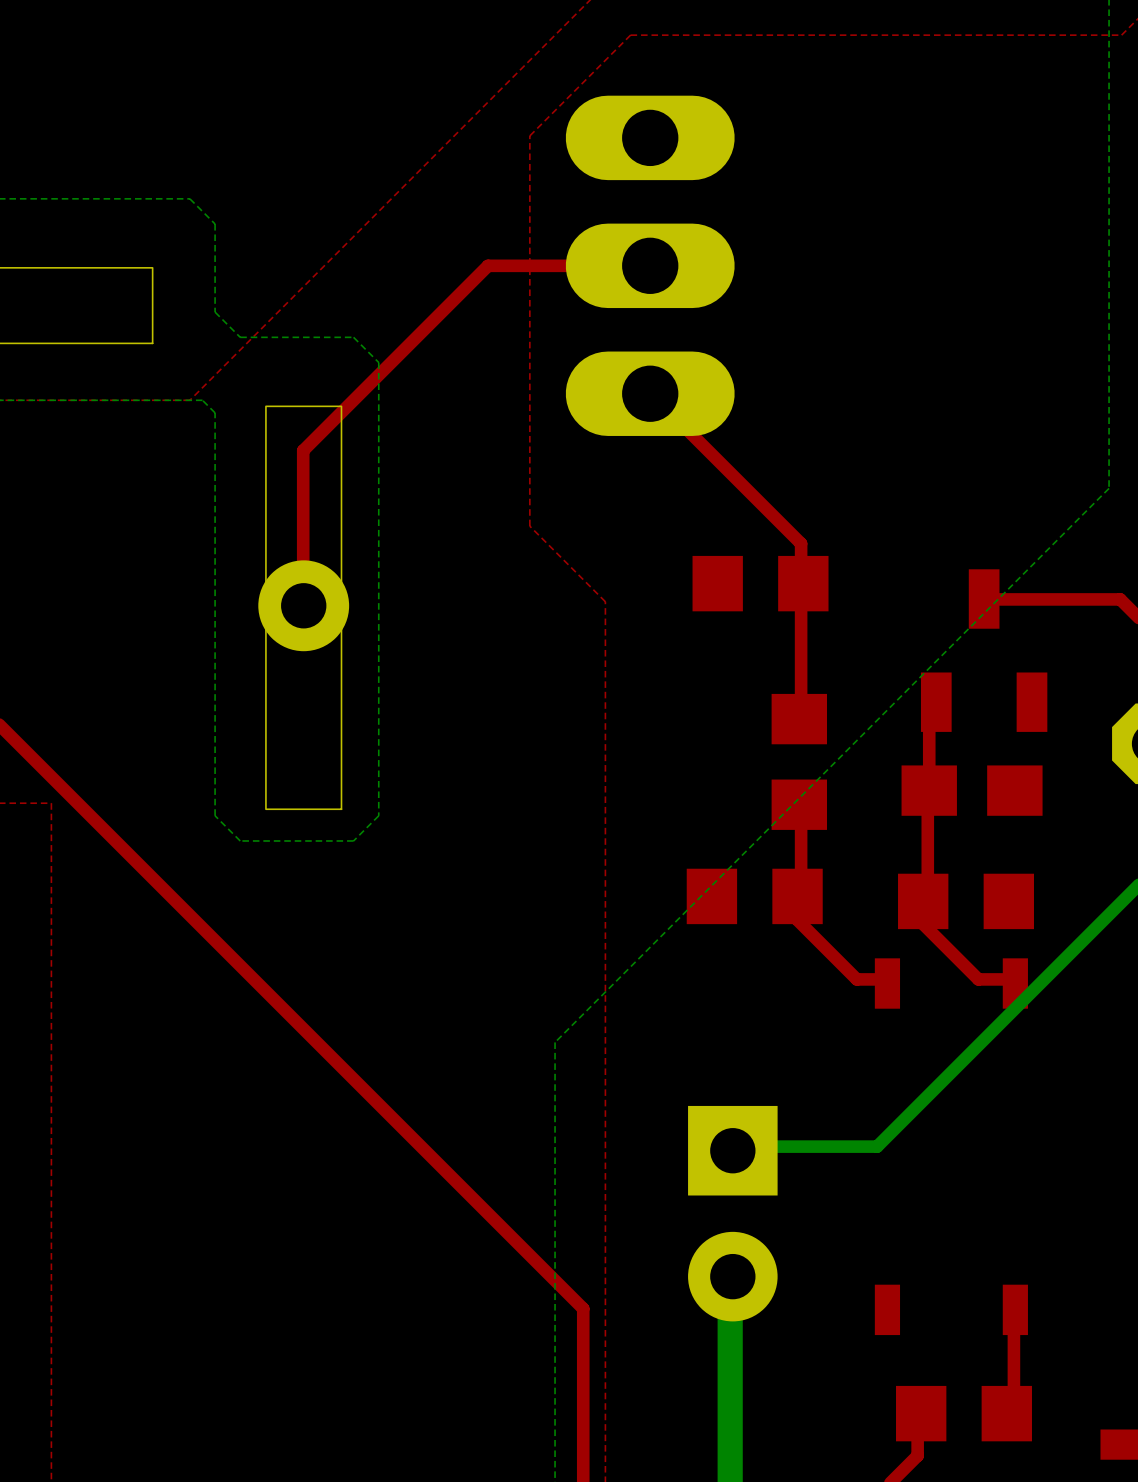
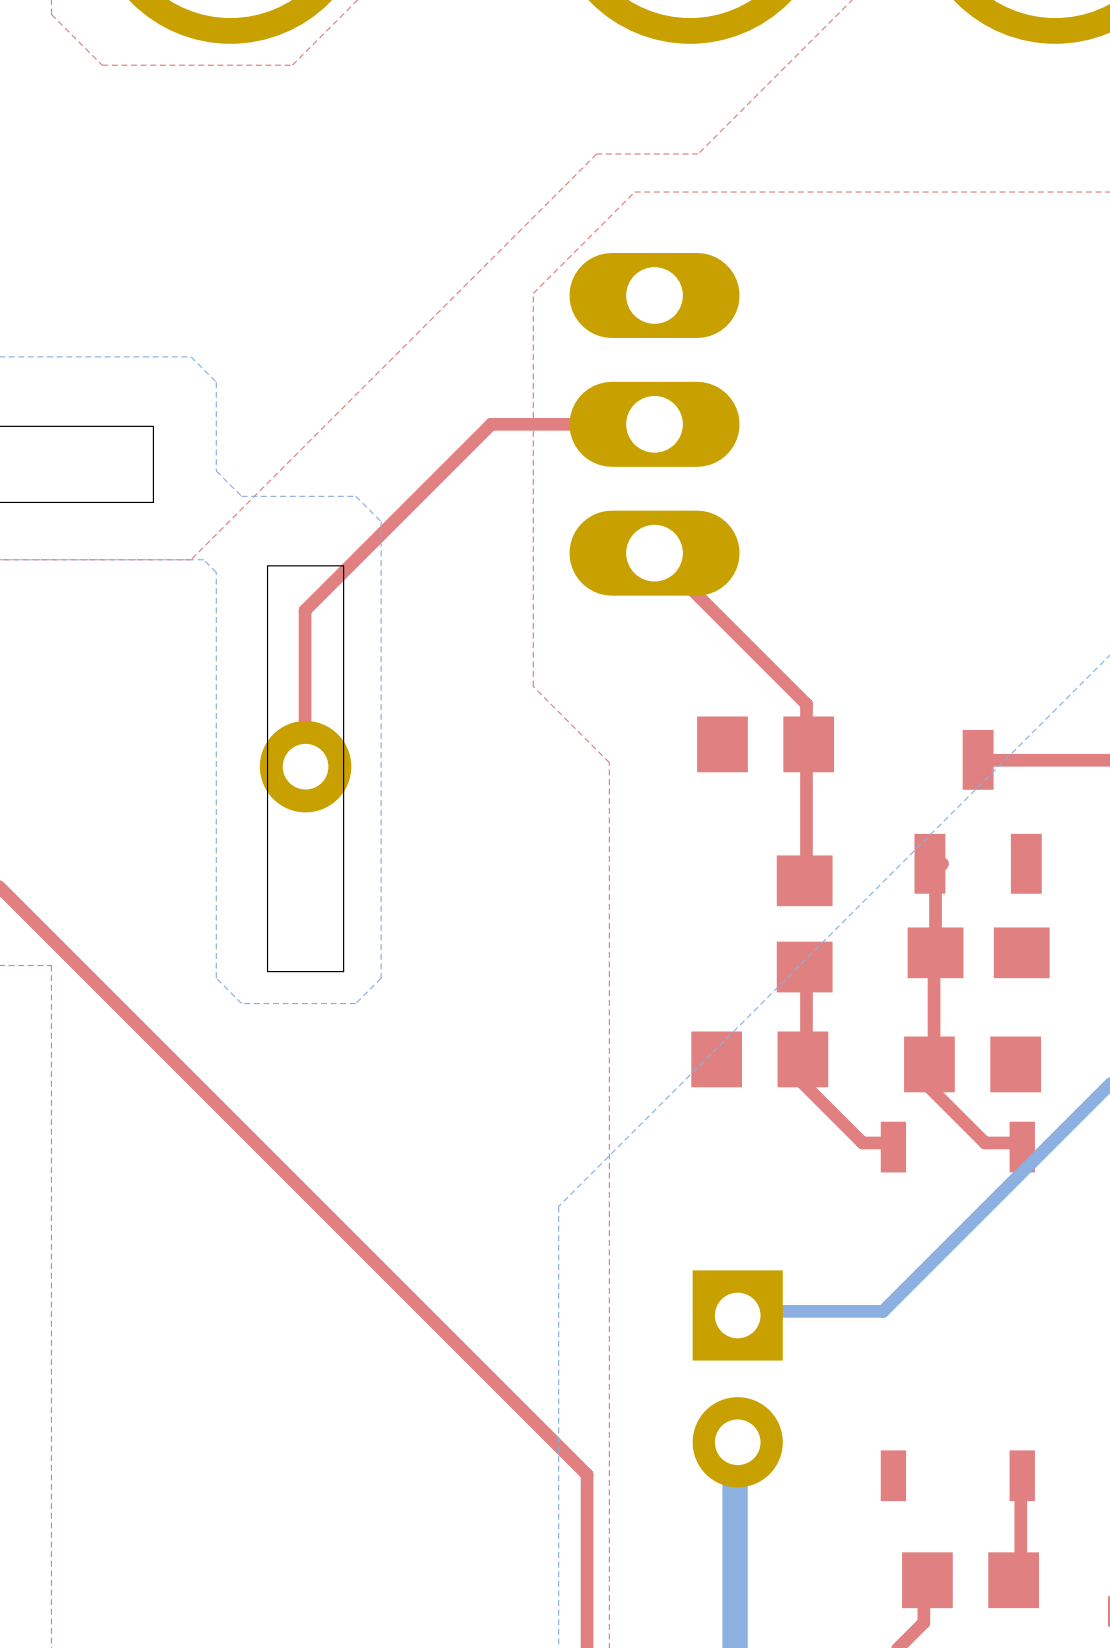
part position: (984, 650) -> (978, 811)

